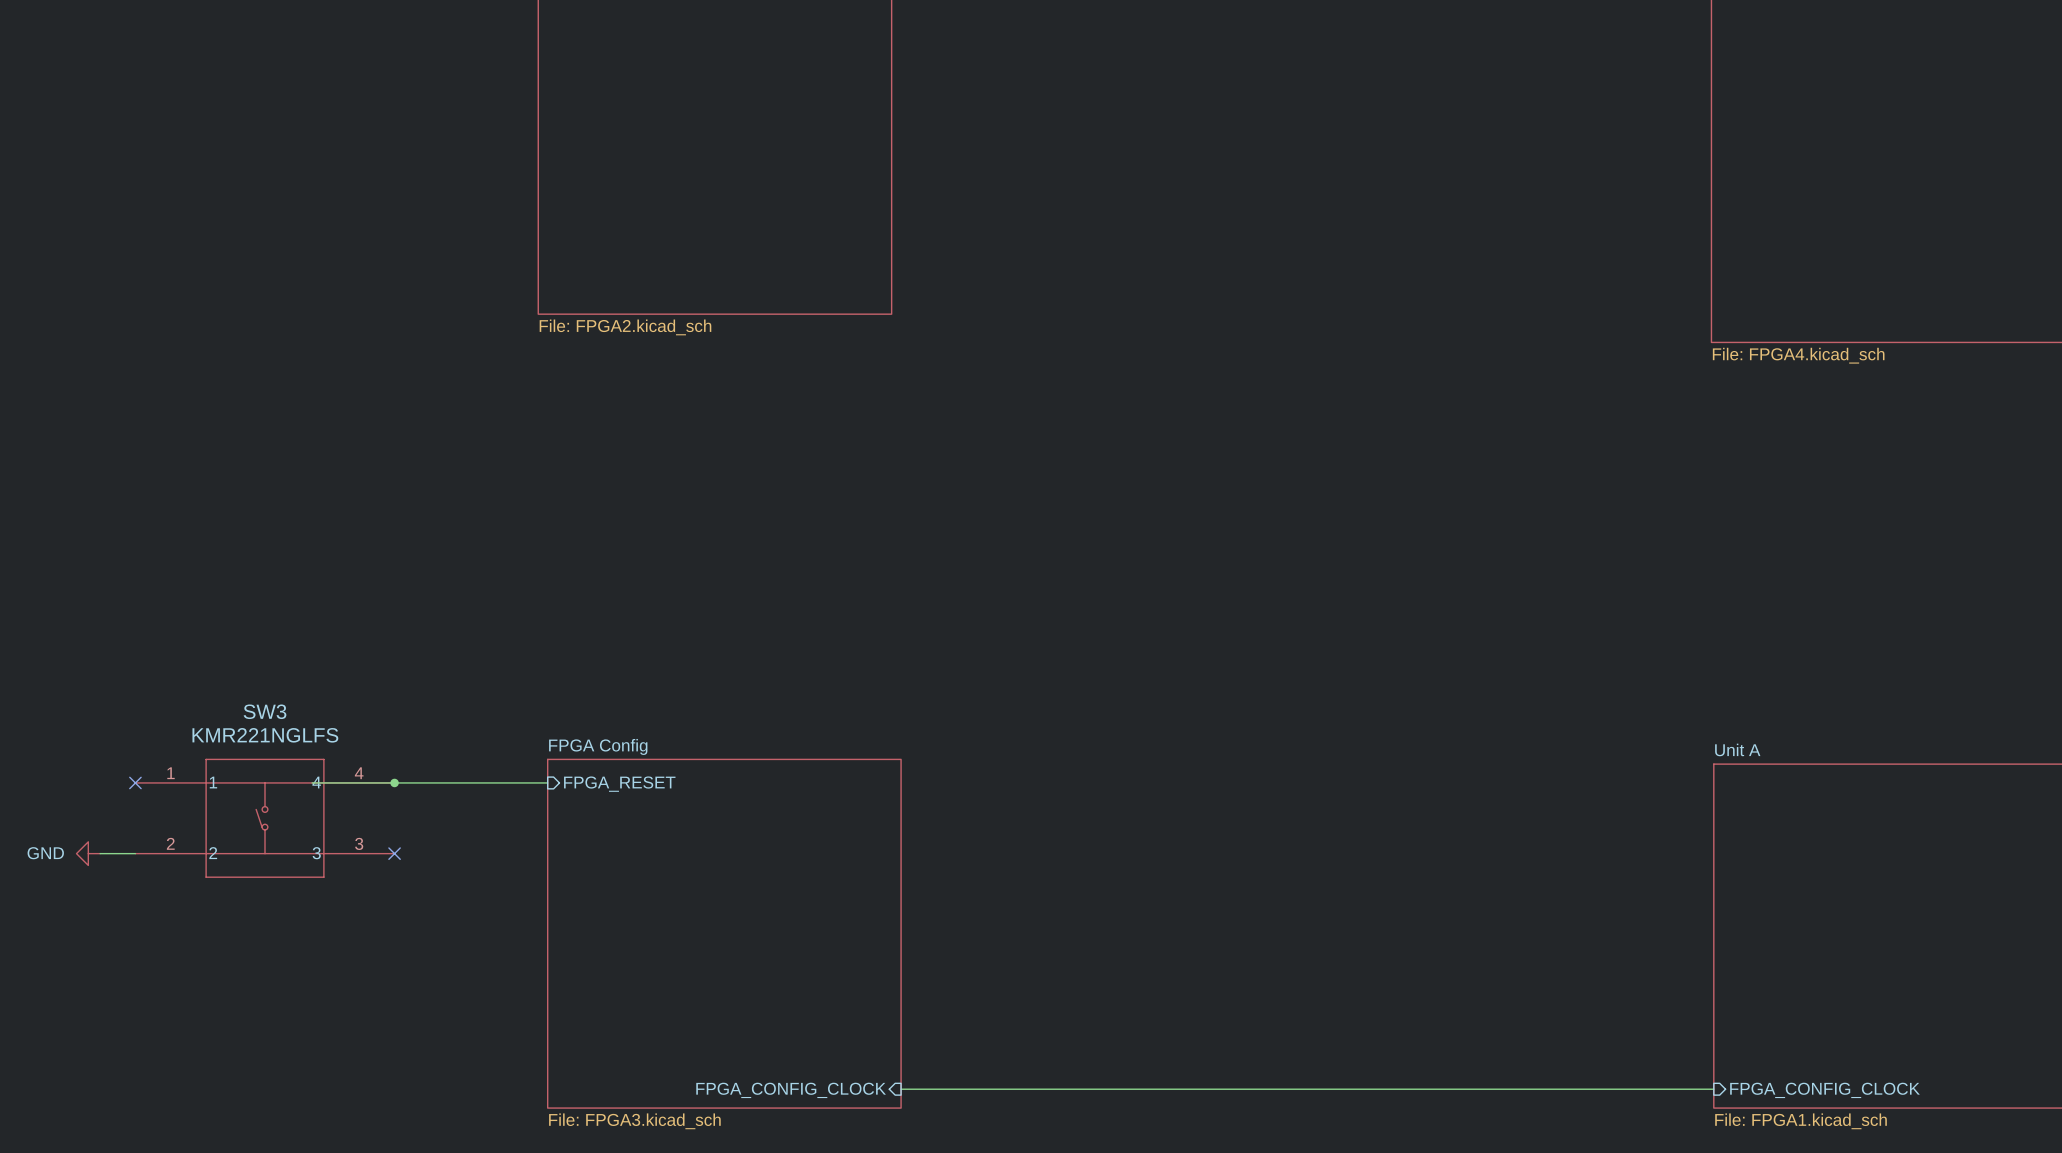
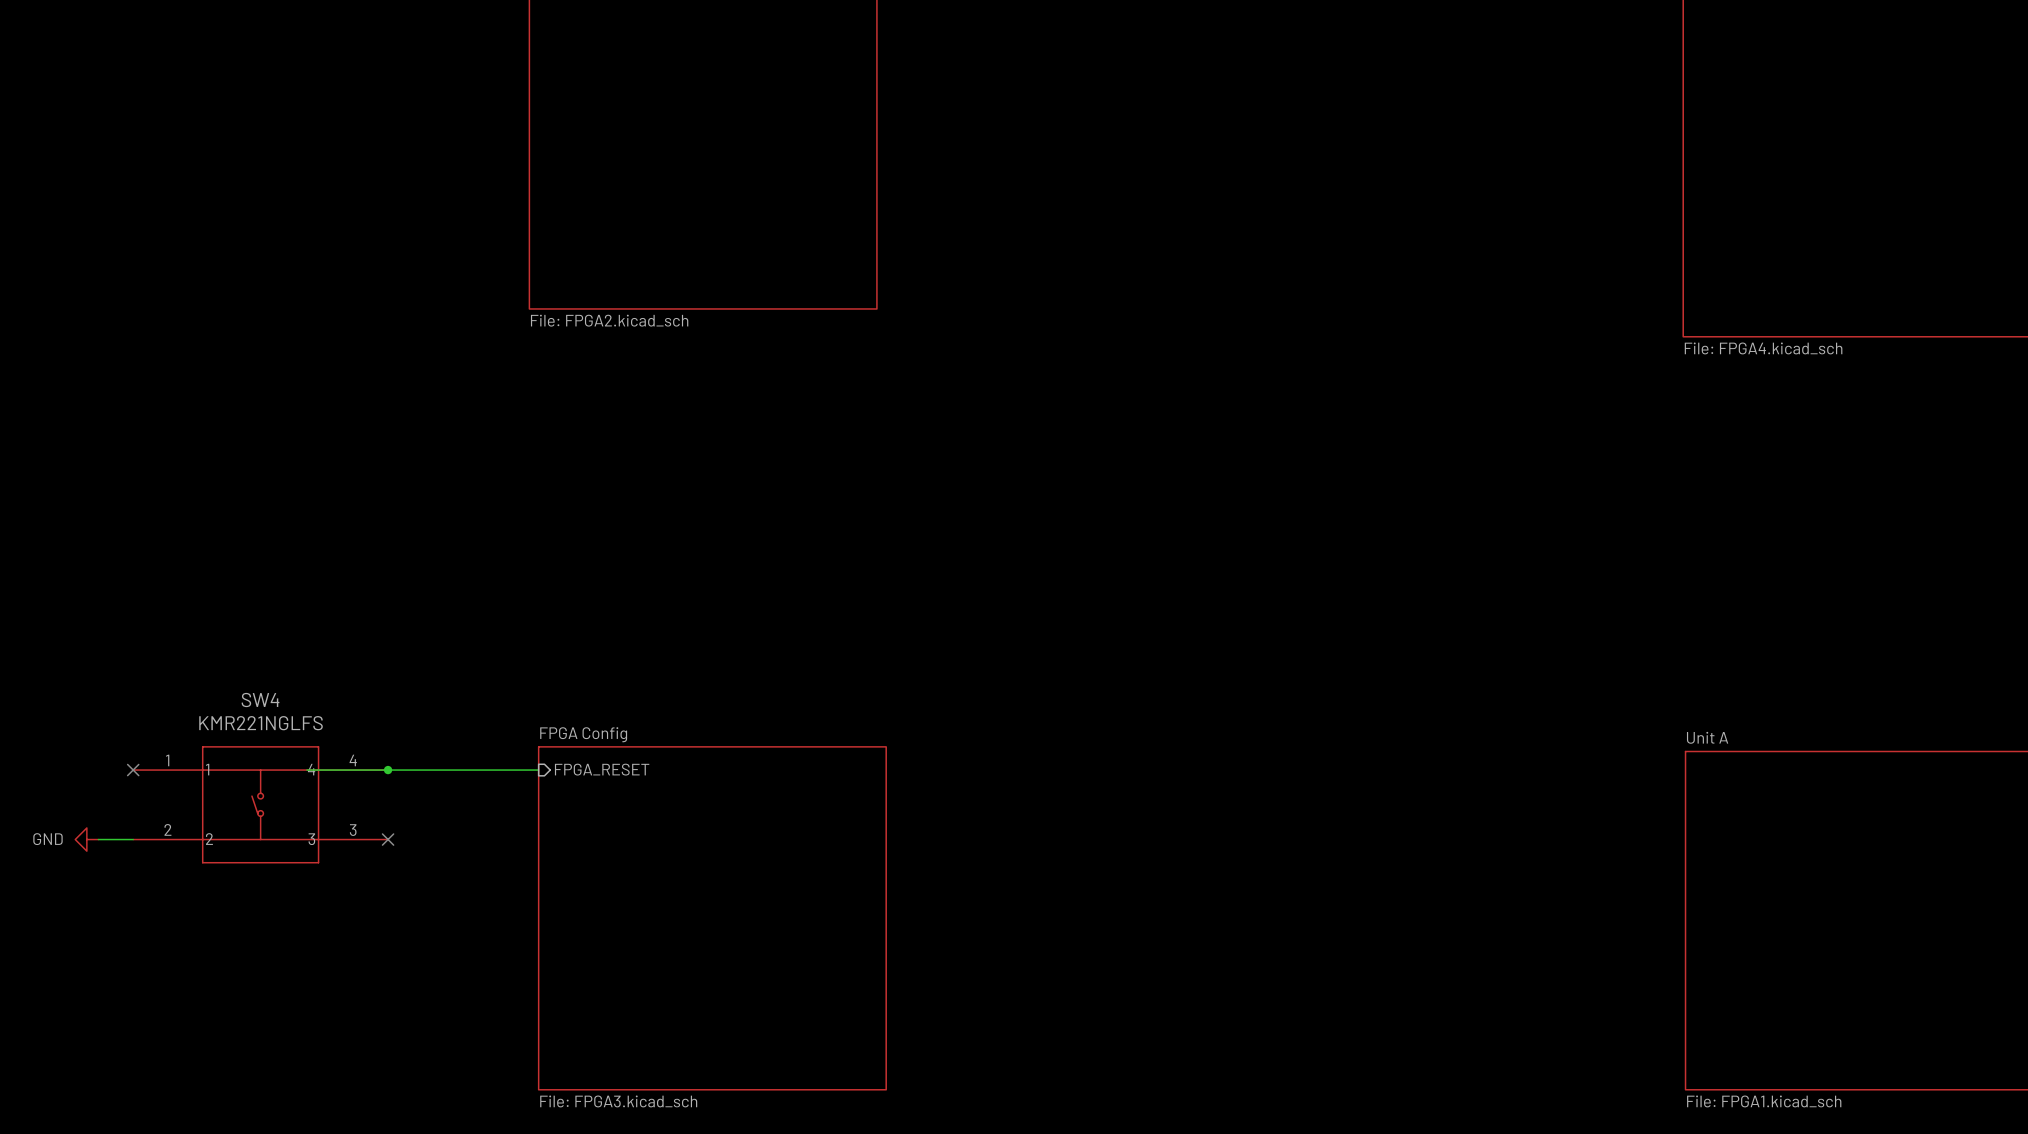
SW3 name: SW3 (265, 711) -> SW4 (260, 700)
wire: (901, 1089) (1713, 1089) -> none
sheet pin: FPGA_CONFIG_CLOCK (791, 1090) -> none
sheet pin: FPGA_CONFIG_CLOCK (1824, 1090) -> none

